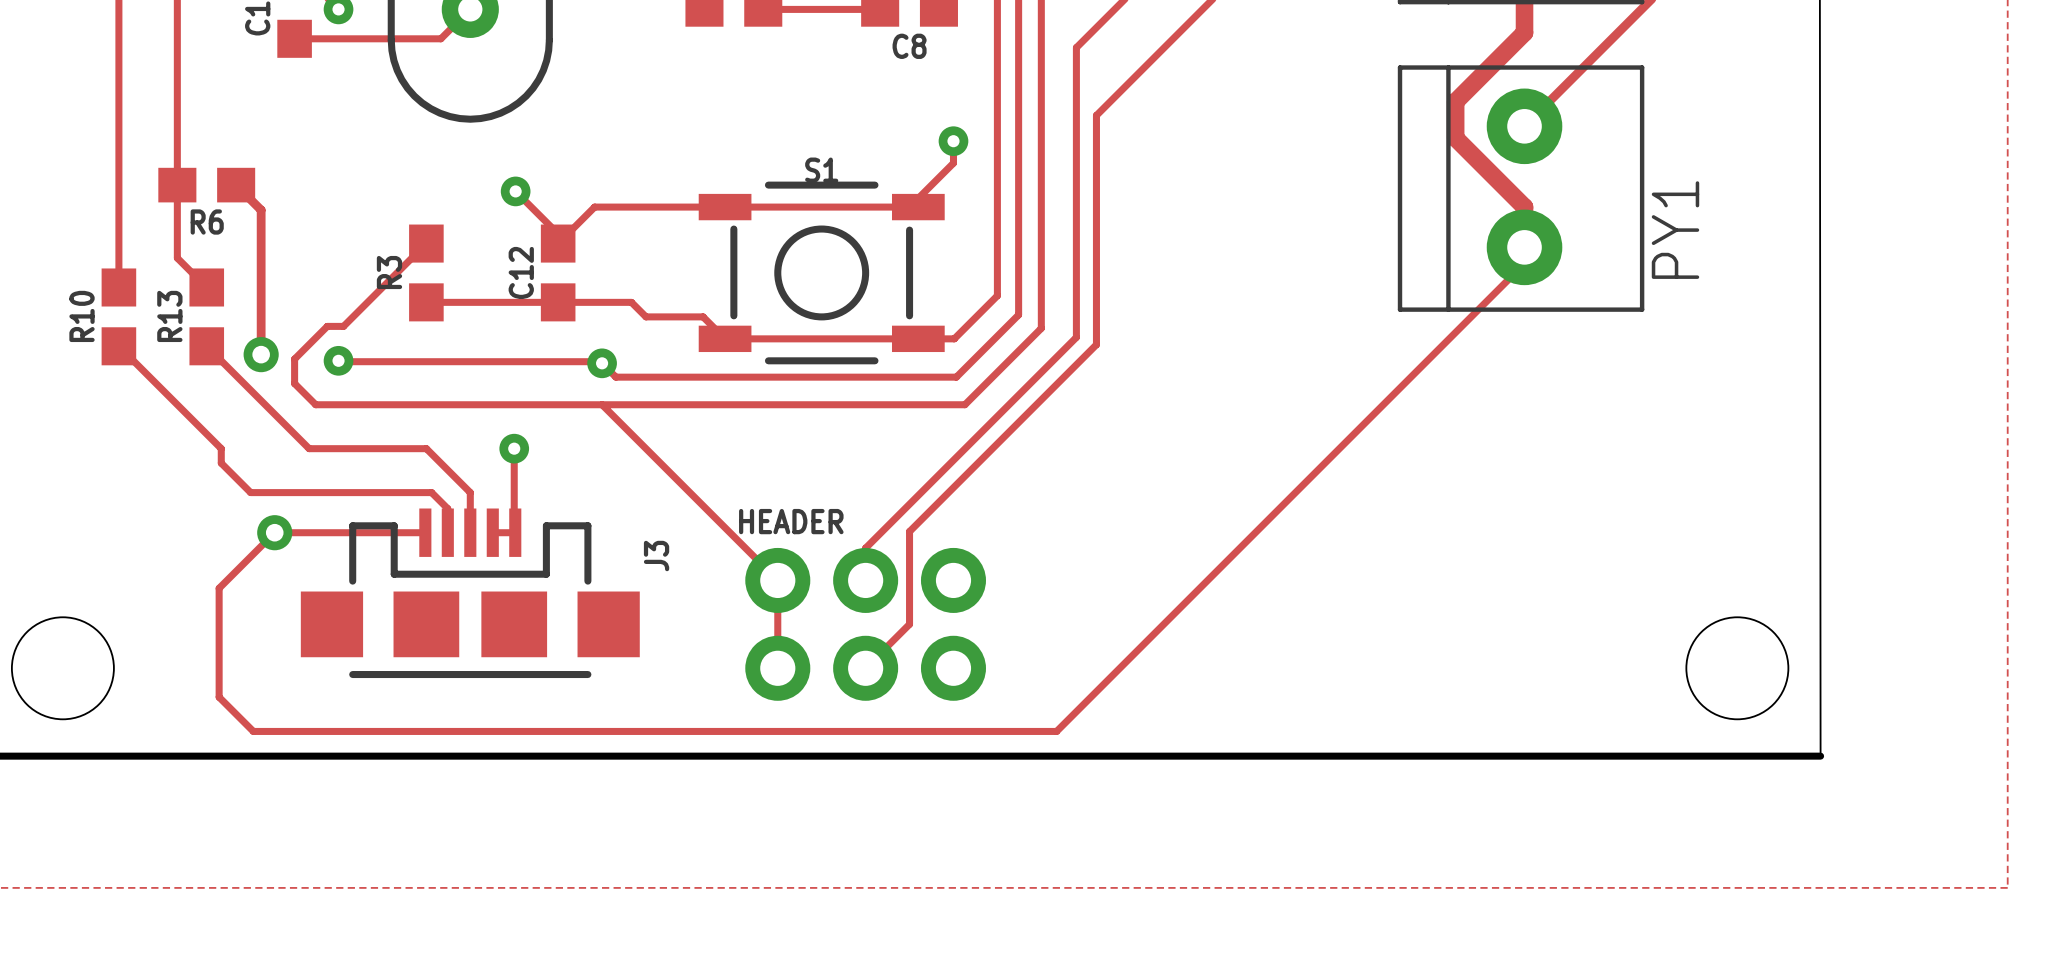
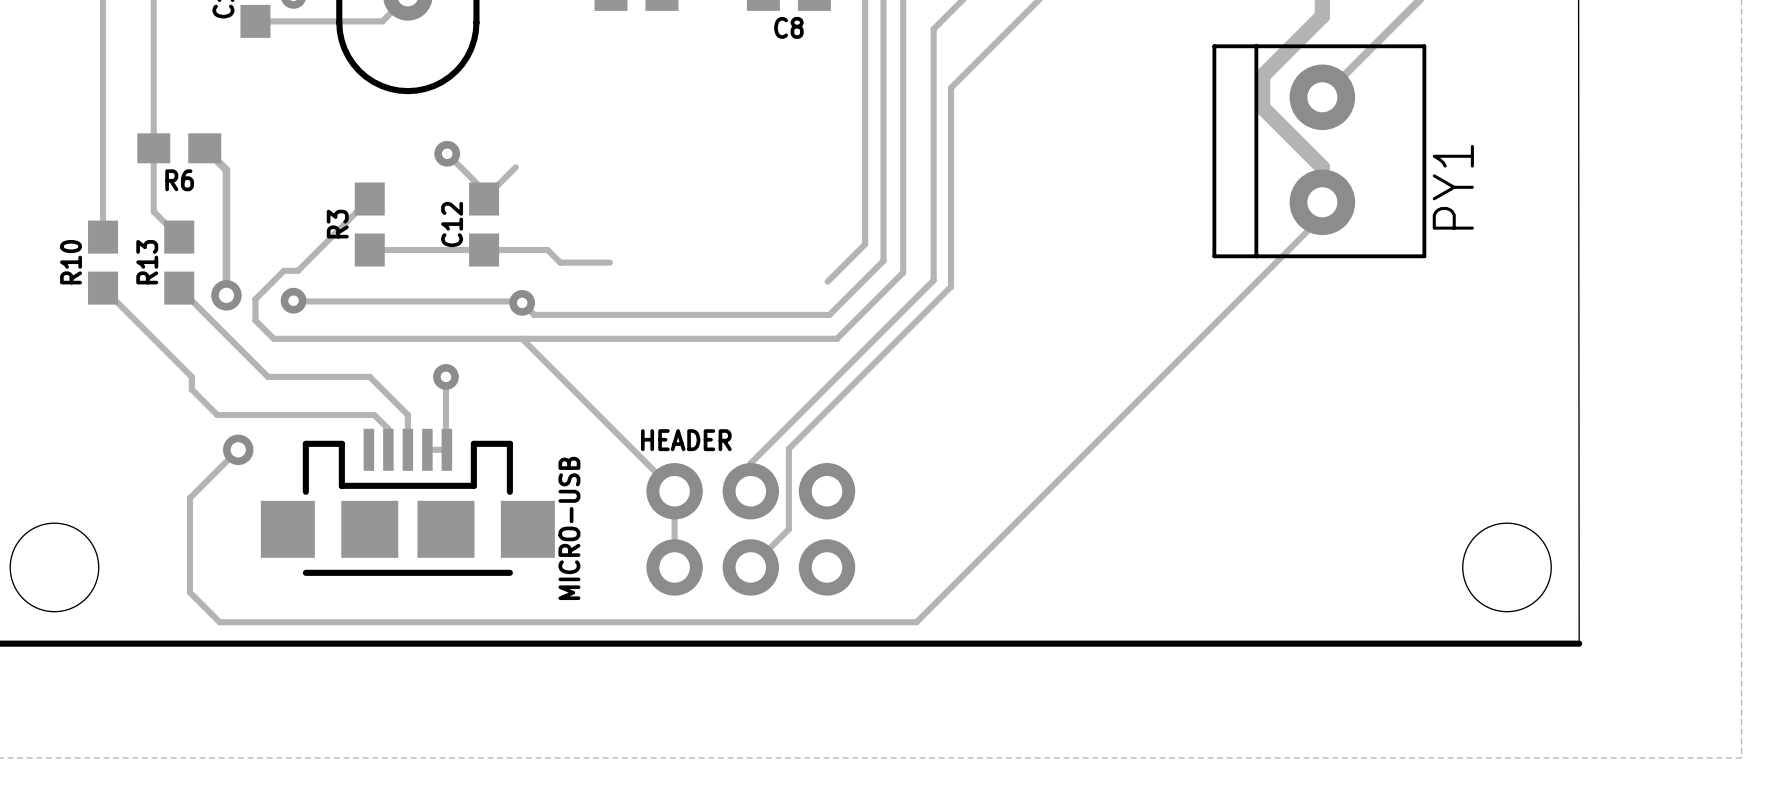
track: (953, 141) (953, 163) (909, 207) -> none
via: (953, 141) -> none
track: (594, 207) (918, 207) -> none
S1: (821, 272) -> none
track: (703, 316) (725, 338) (954, 338) -> none
track: (274, 532) (425, 532) -> none
J3 name: J3 (656, 556) -> MICRO-USB (569, 528)

